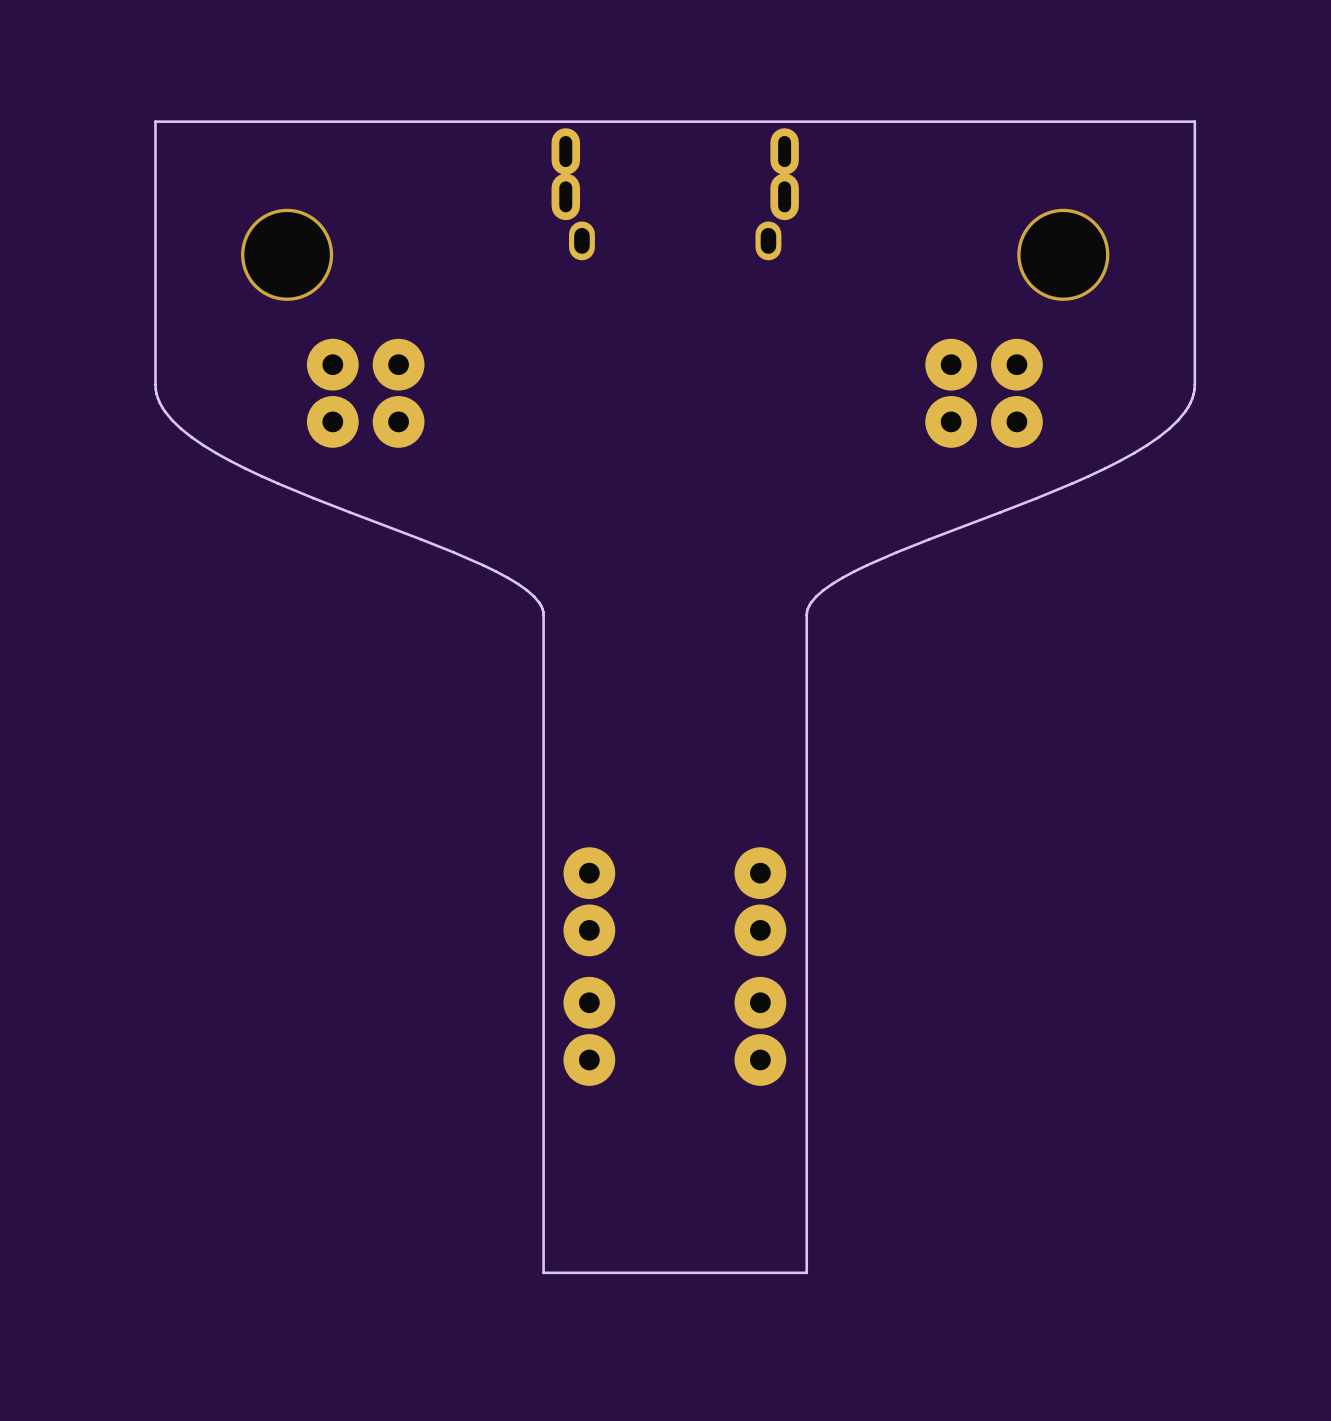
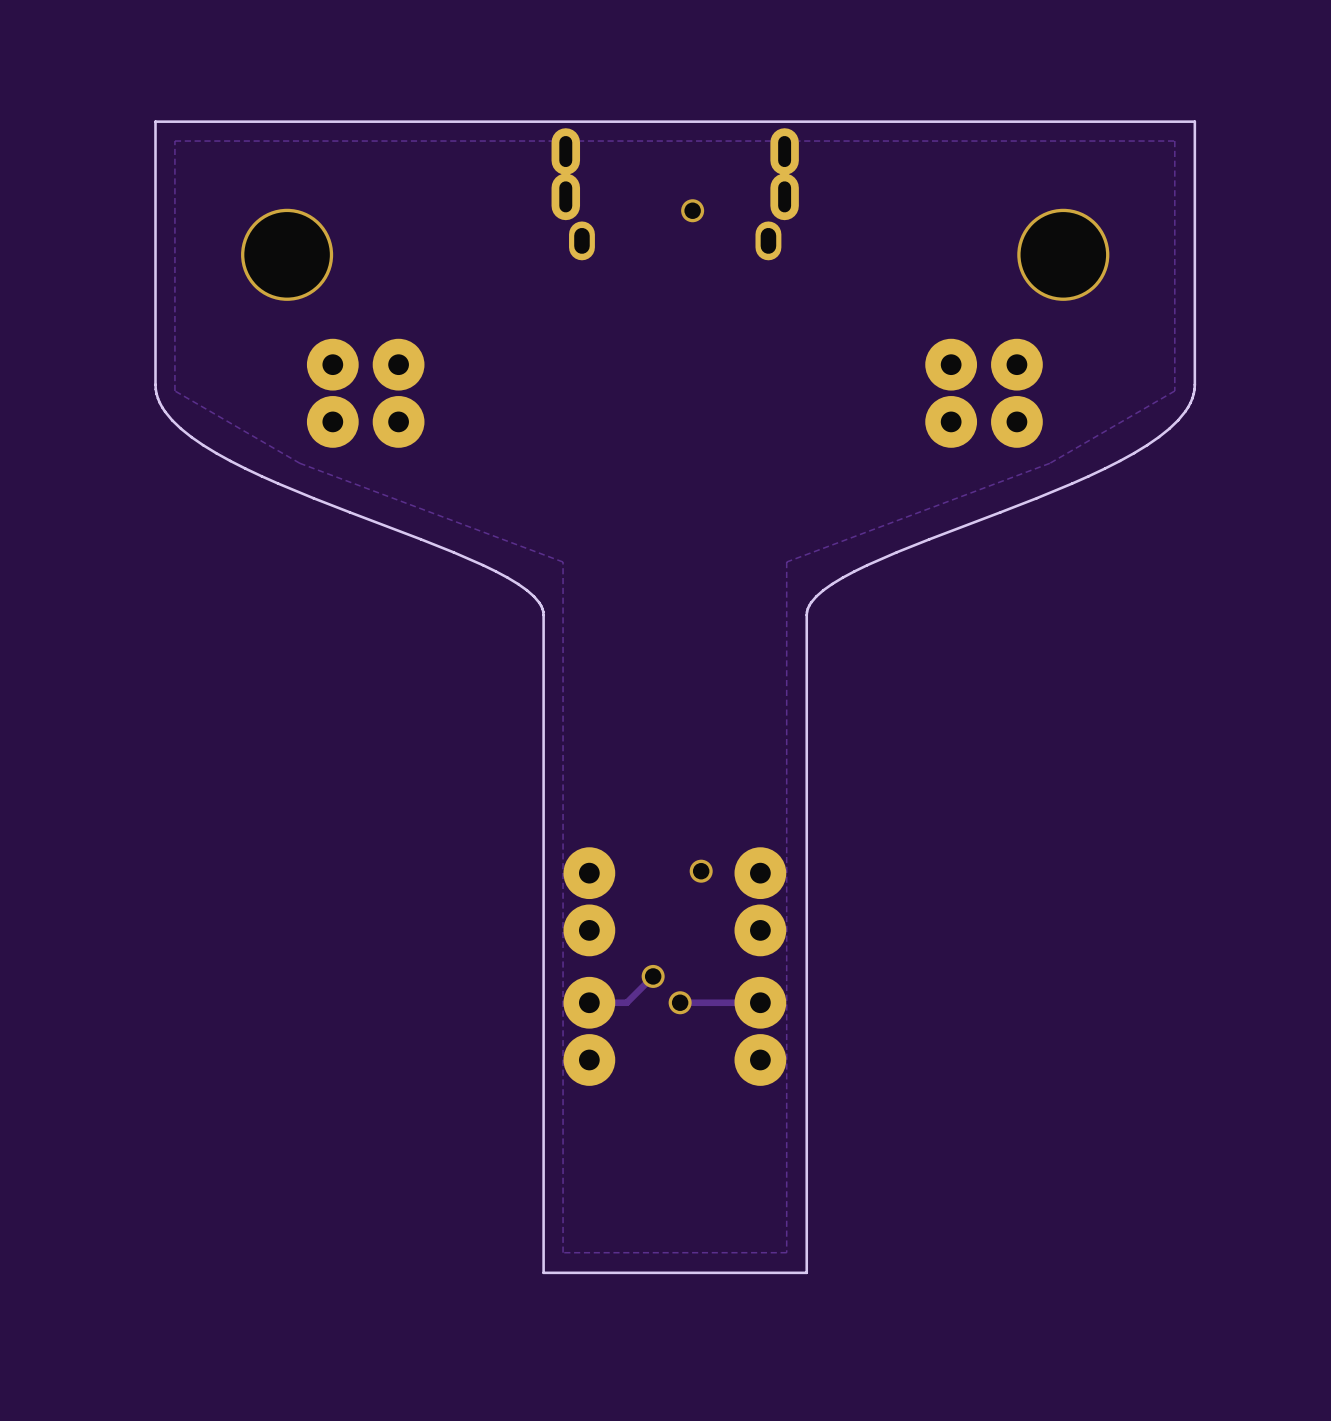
zone outline: none -> (1174, 141) (174, 141) (174, 390) (299, 463) (563, 562) (563, 1252) (786, 1252) (786, 562) (1049, 463) (1174, 390) (1174, 141)
via: none -> (692, 210)
via: none -> (701, 871)
track: none -> (653, 976) (626, 1002) (589, 1002)
via: none -> (653, 976)
via: none -> (680, 1002)
track: none -> (760, 1002) (675, 1002)

